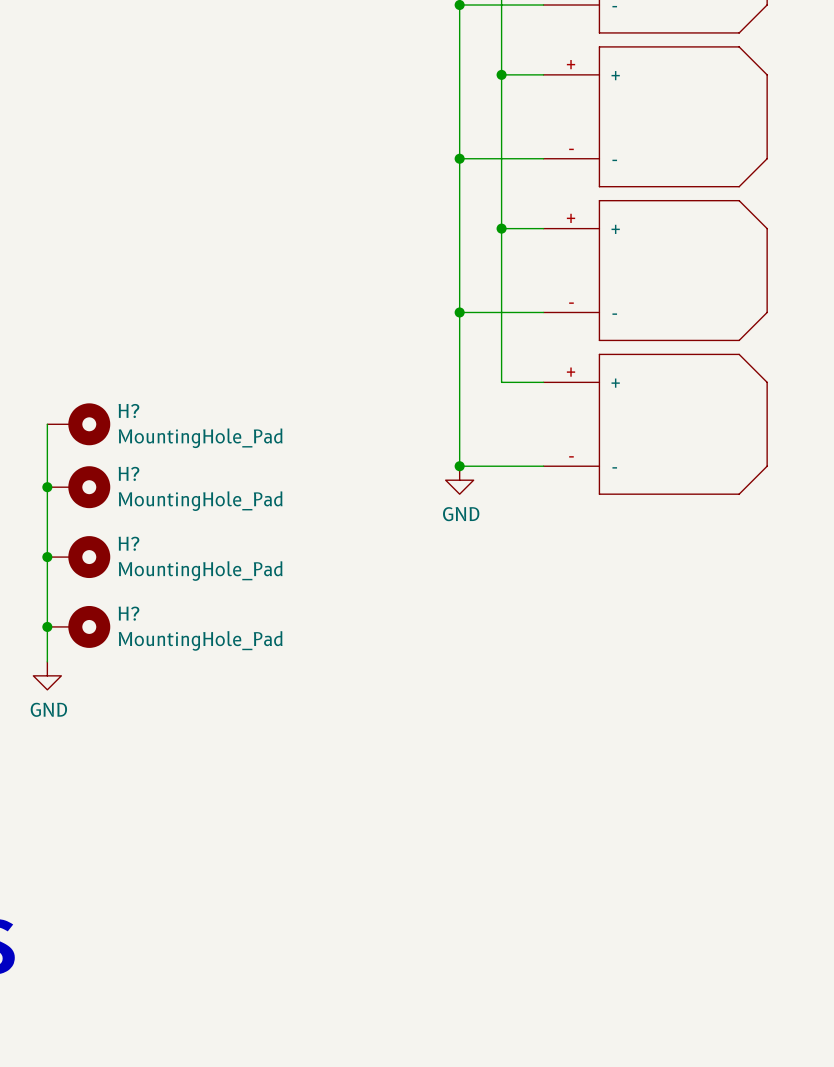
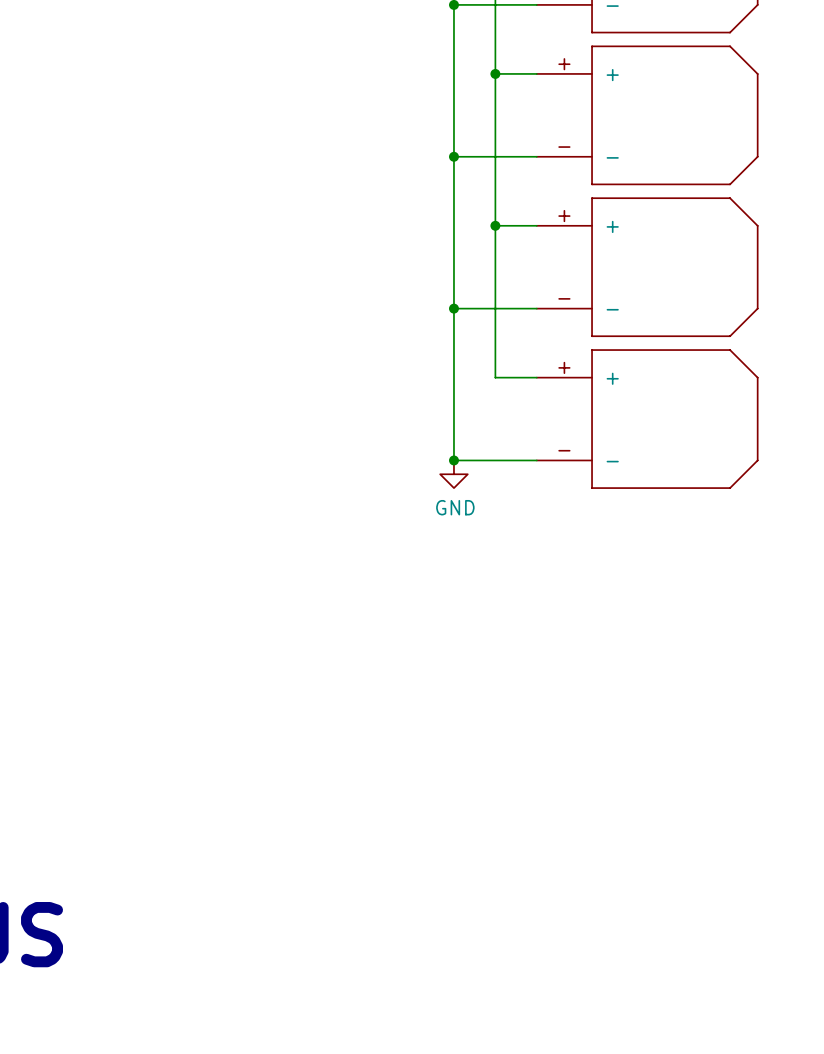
wire: (47, 424) (47, 661) -> none
H?: MountingHole_Pad (78, 424) -> none
junction: (47, 487) -> none
H?: MountingHole_Pad (78, 487) -> none
junction: (47, 557) -> none
H?: MountingHole_Pad (78, 557) -> none
junction: (47, 626) -> none
H?: MountingHole_Pad (78, 626) -> none
power symbol: GND (47, 675) -> none

